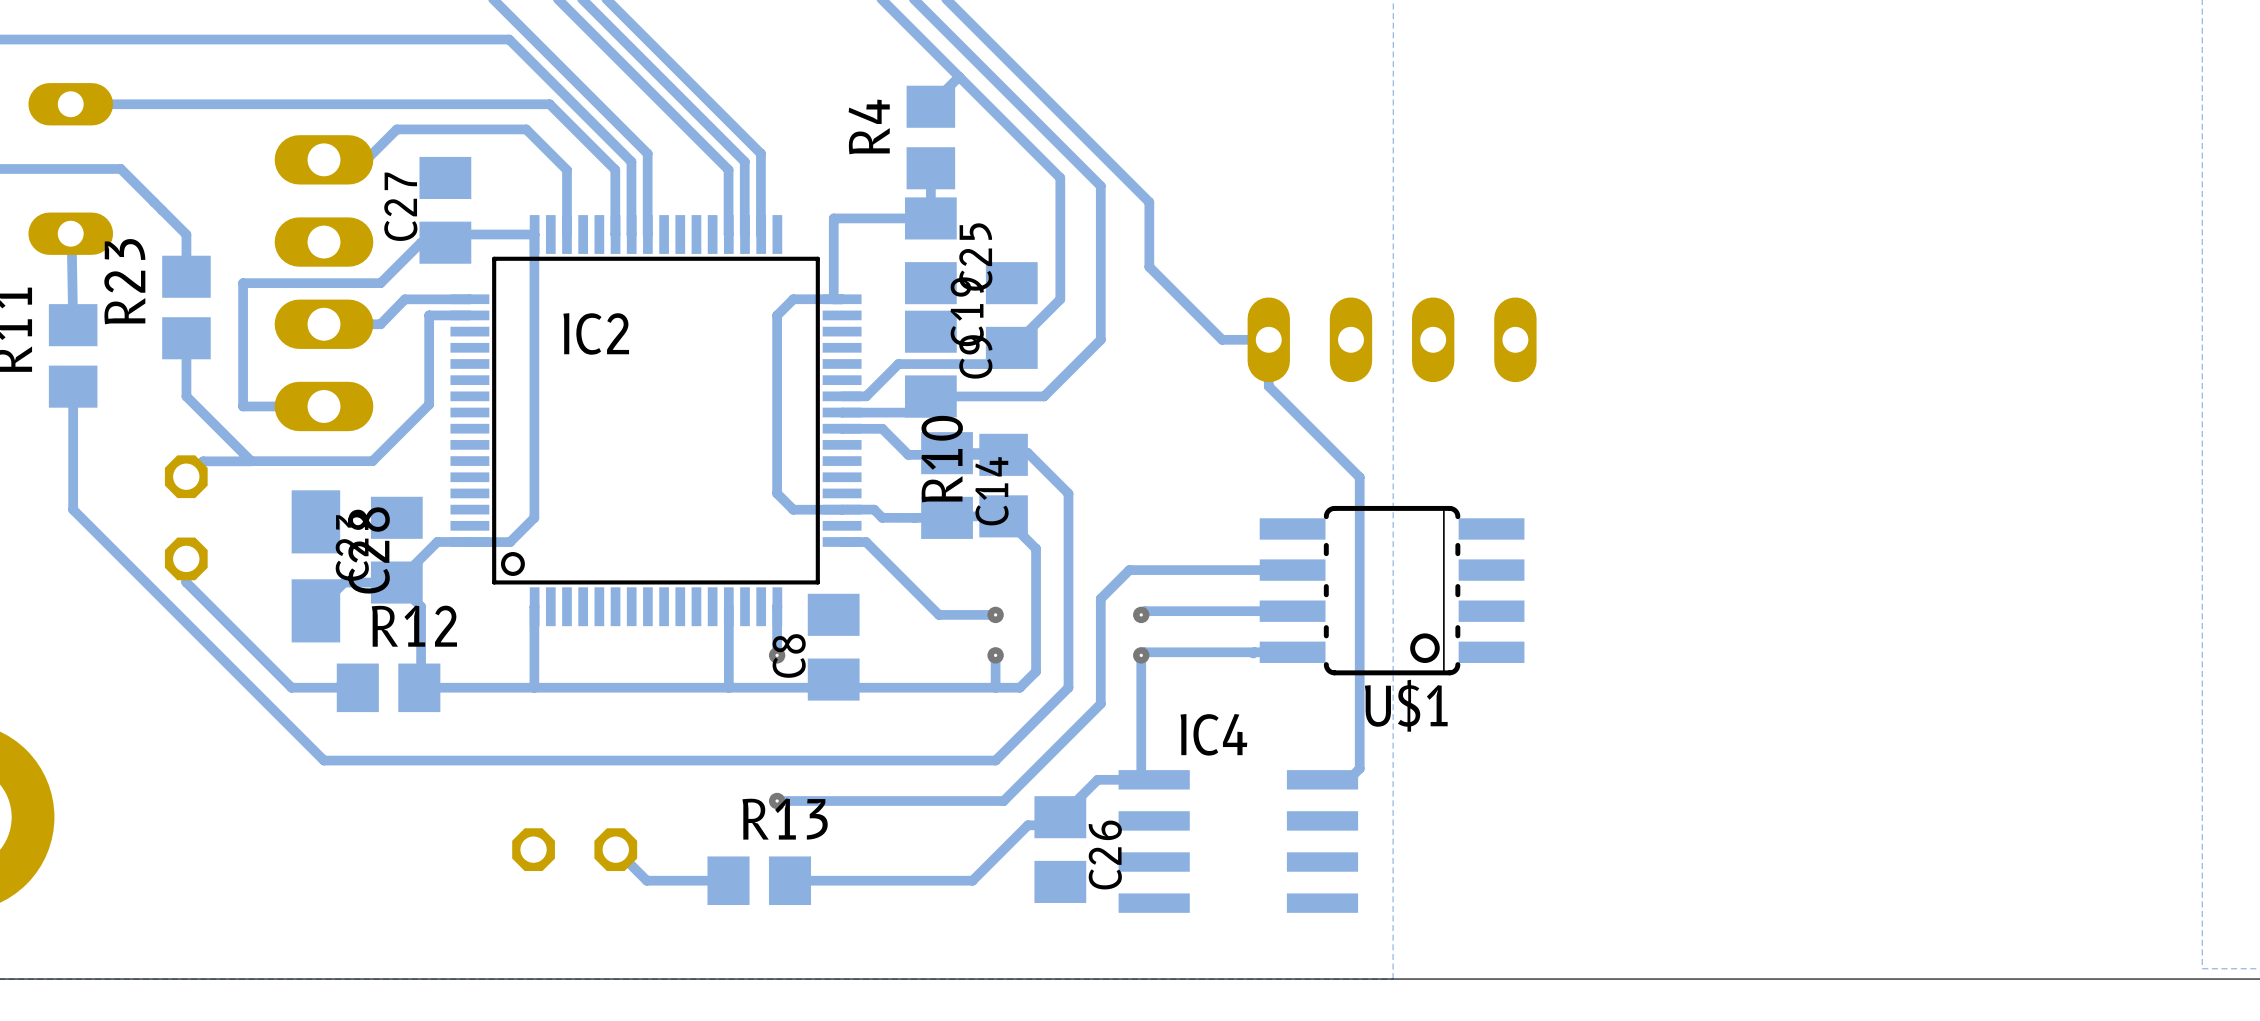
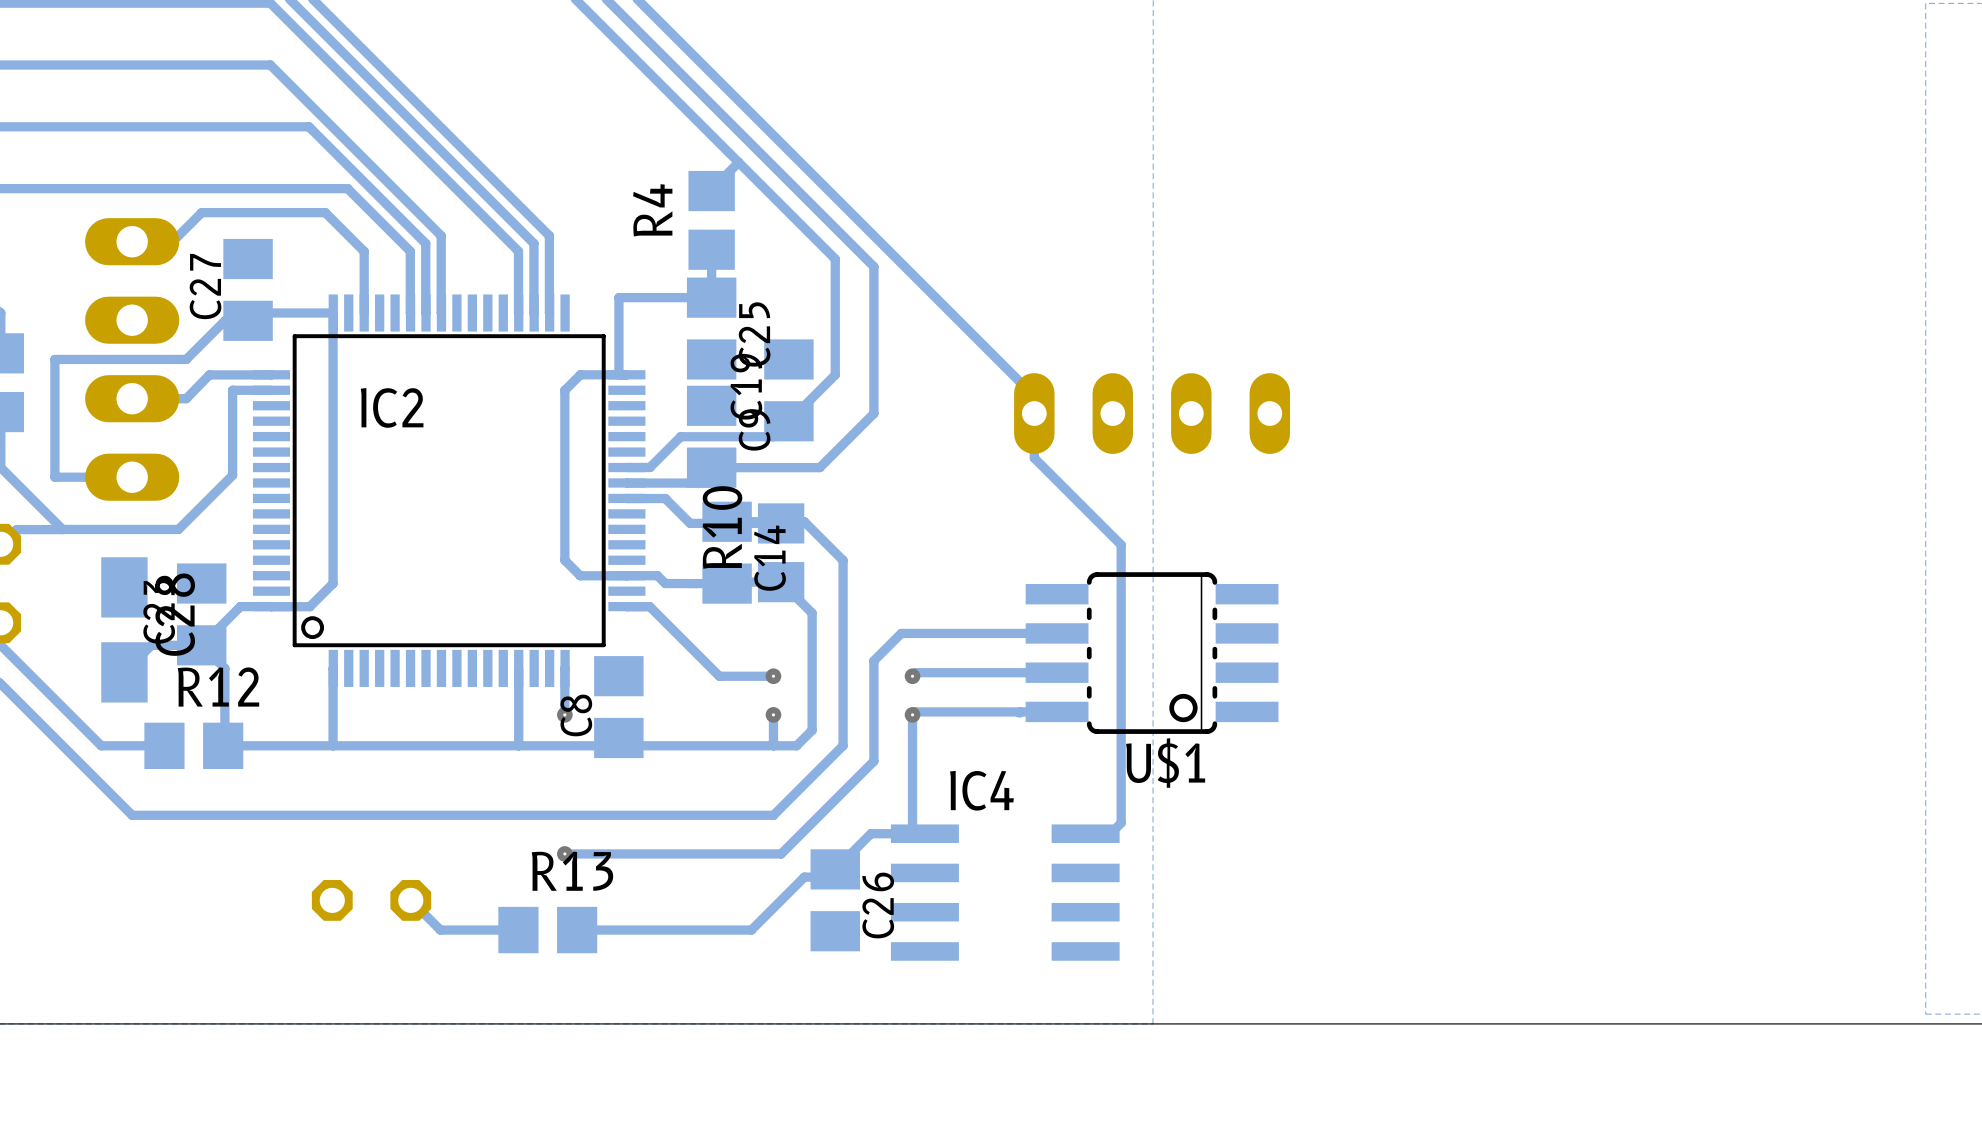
track: (1149, 202) (1149, 266) (1222, 339) (1268, 339) -> (920, 282) (1036, 398) (1034, 413)

